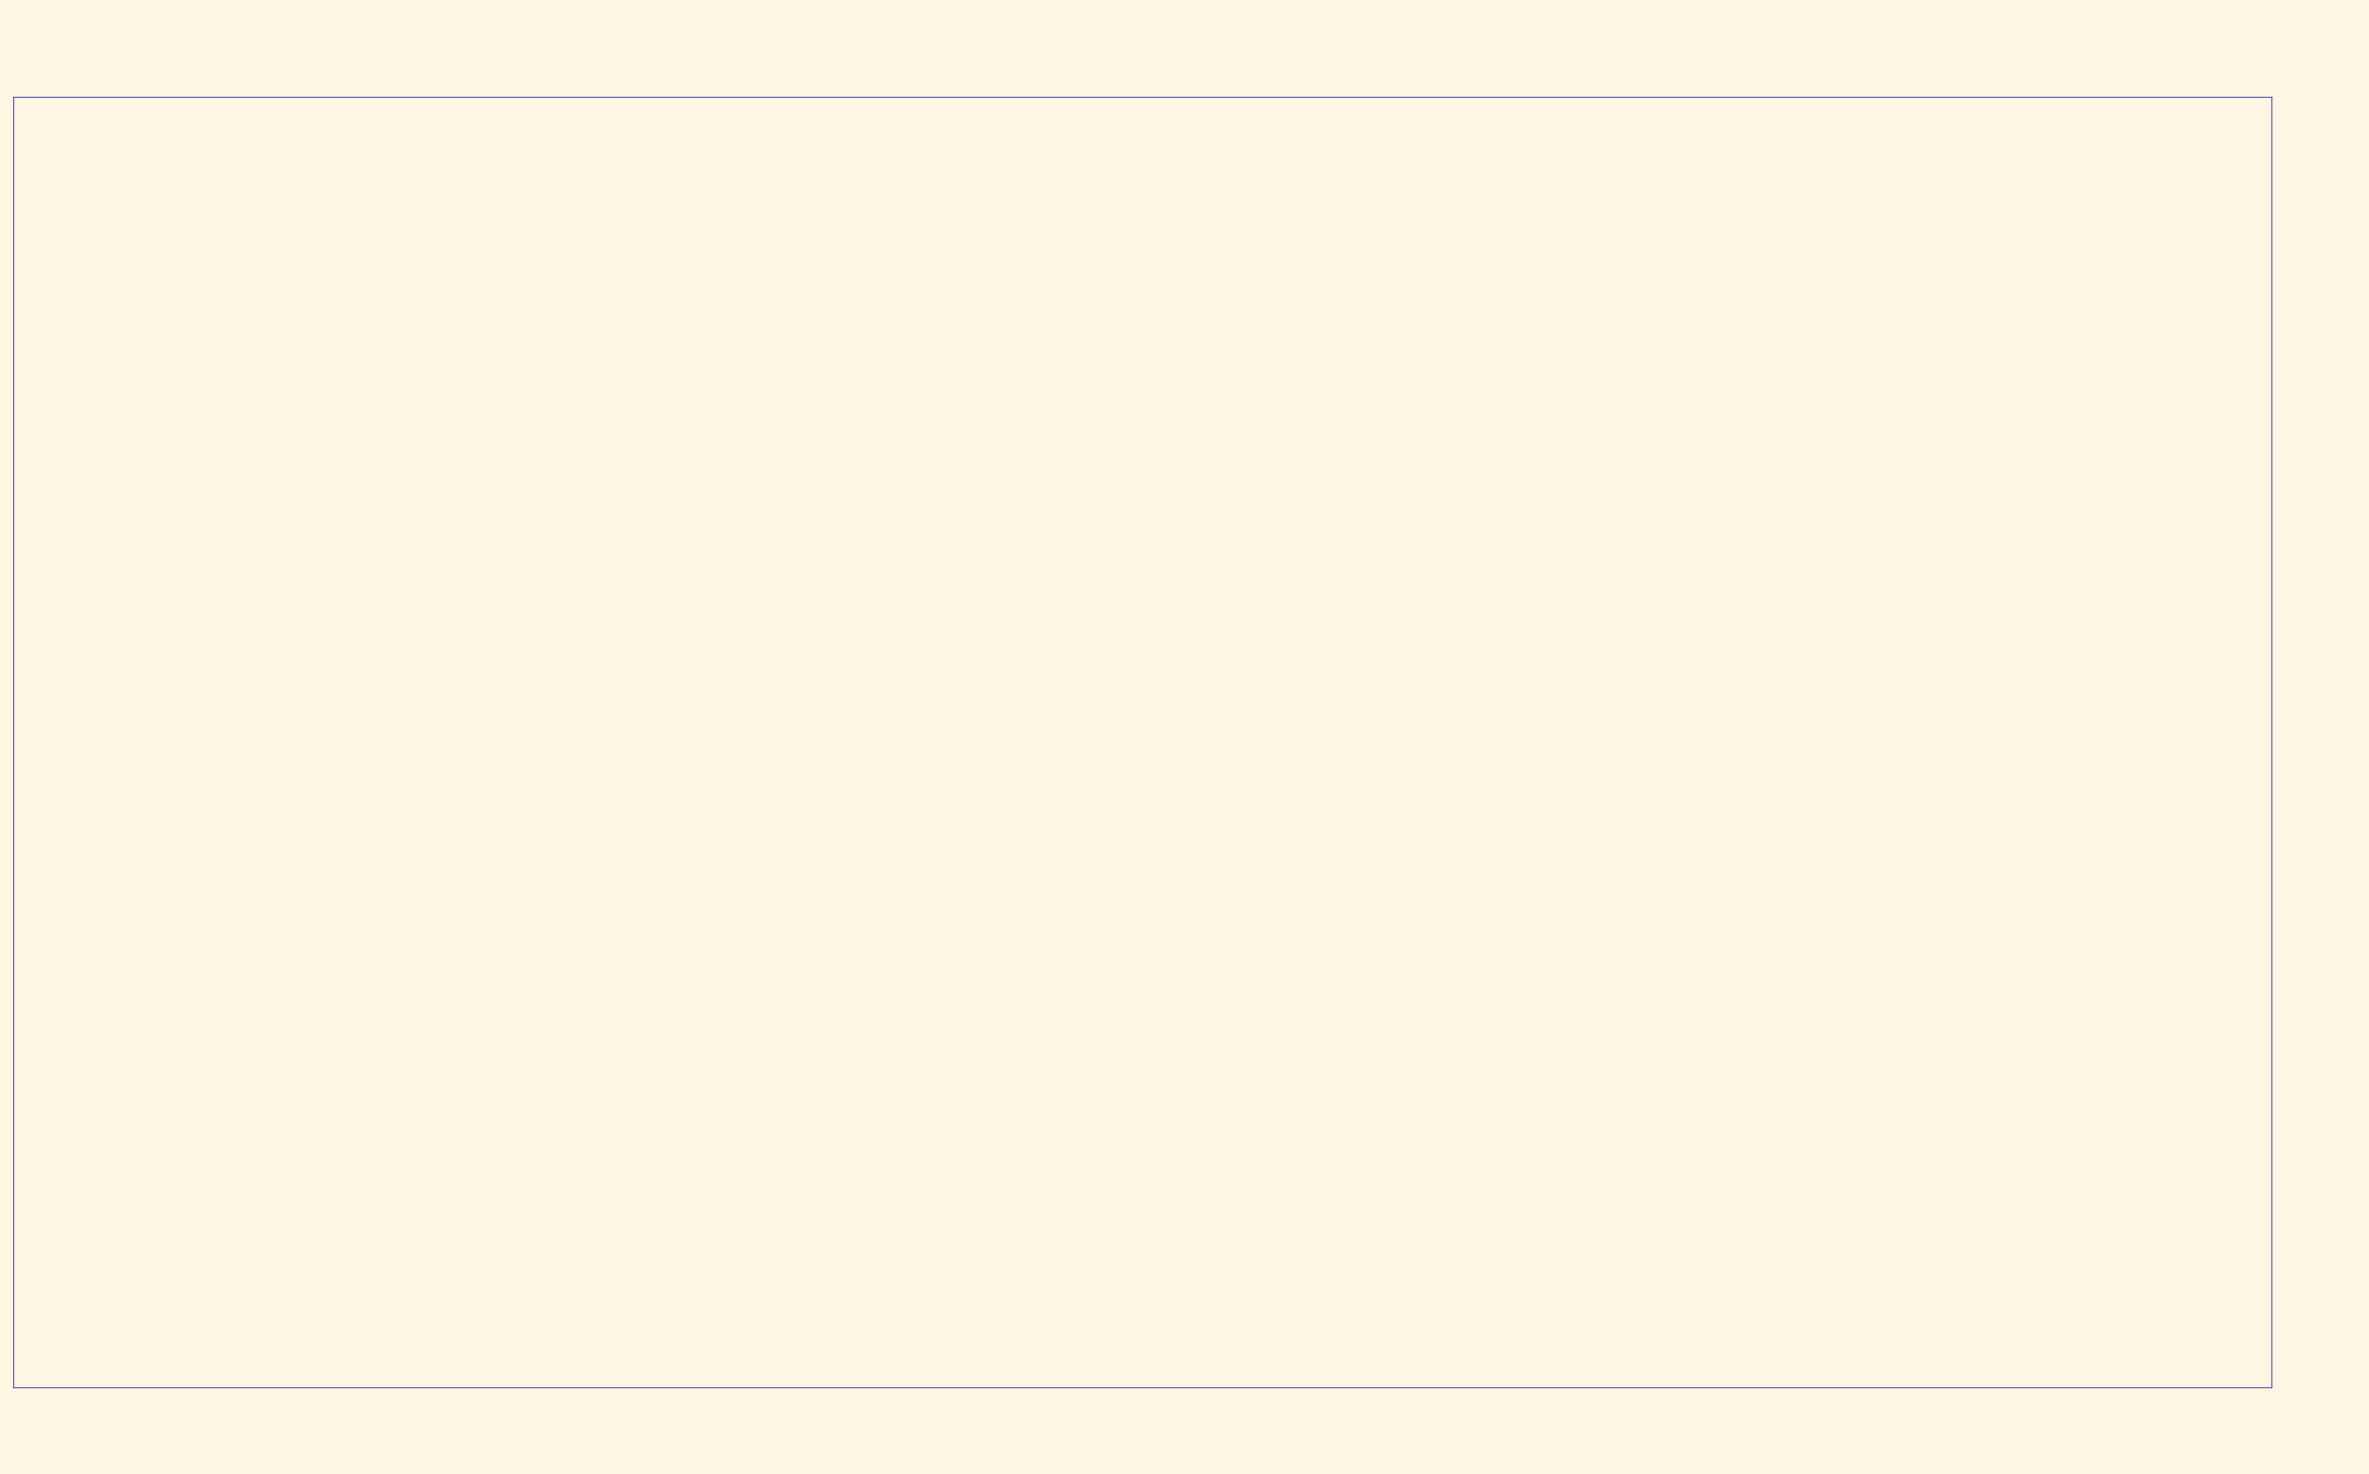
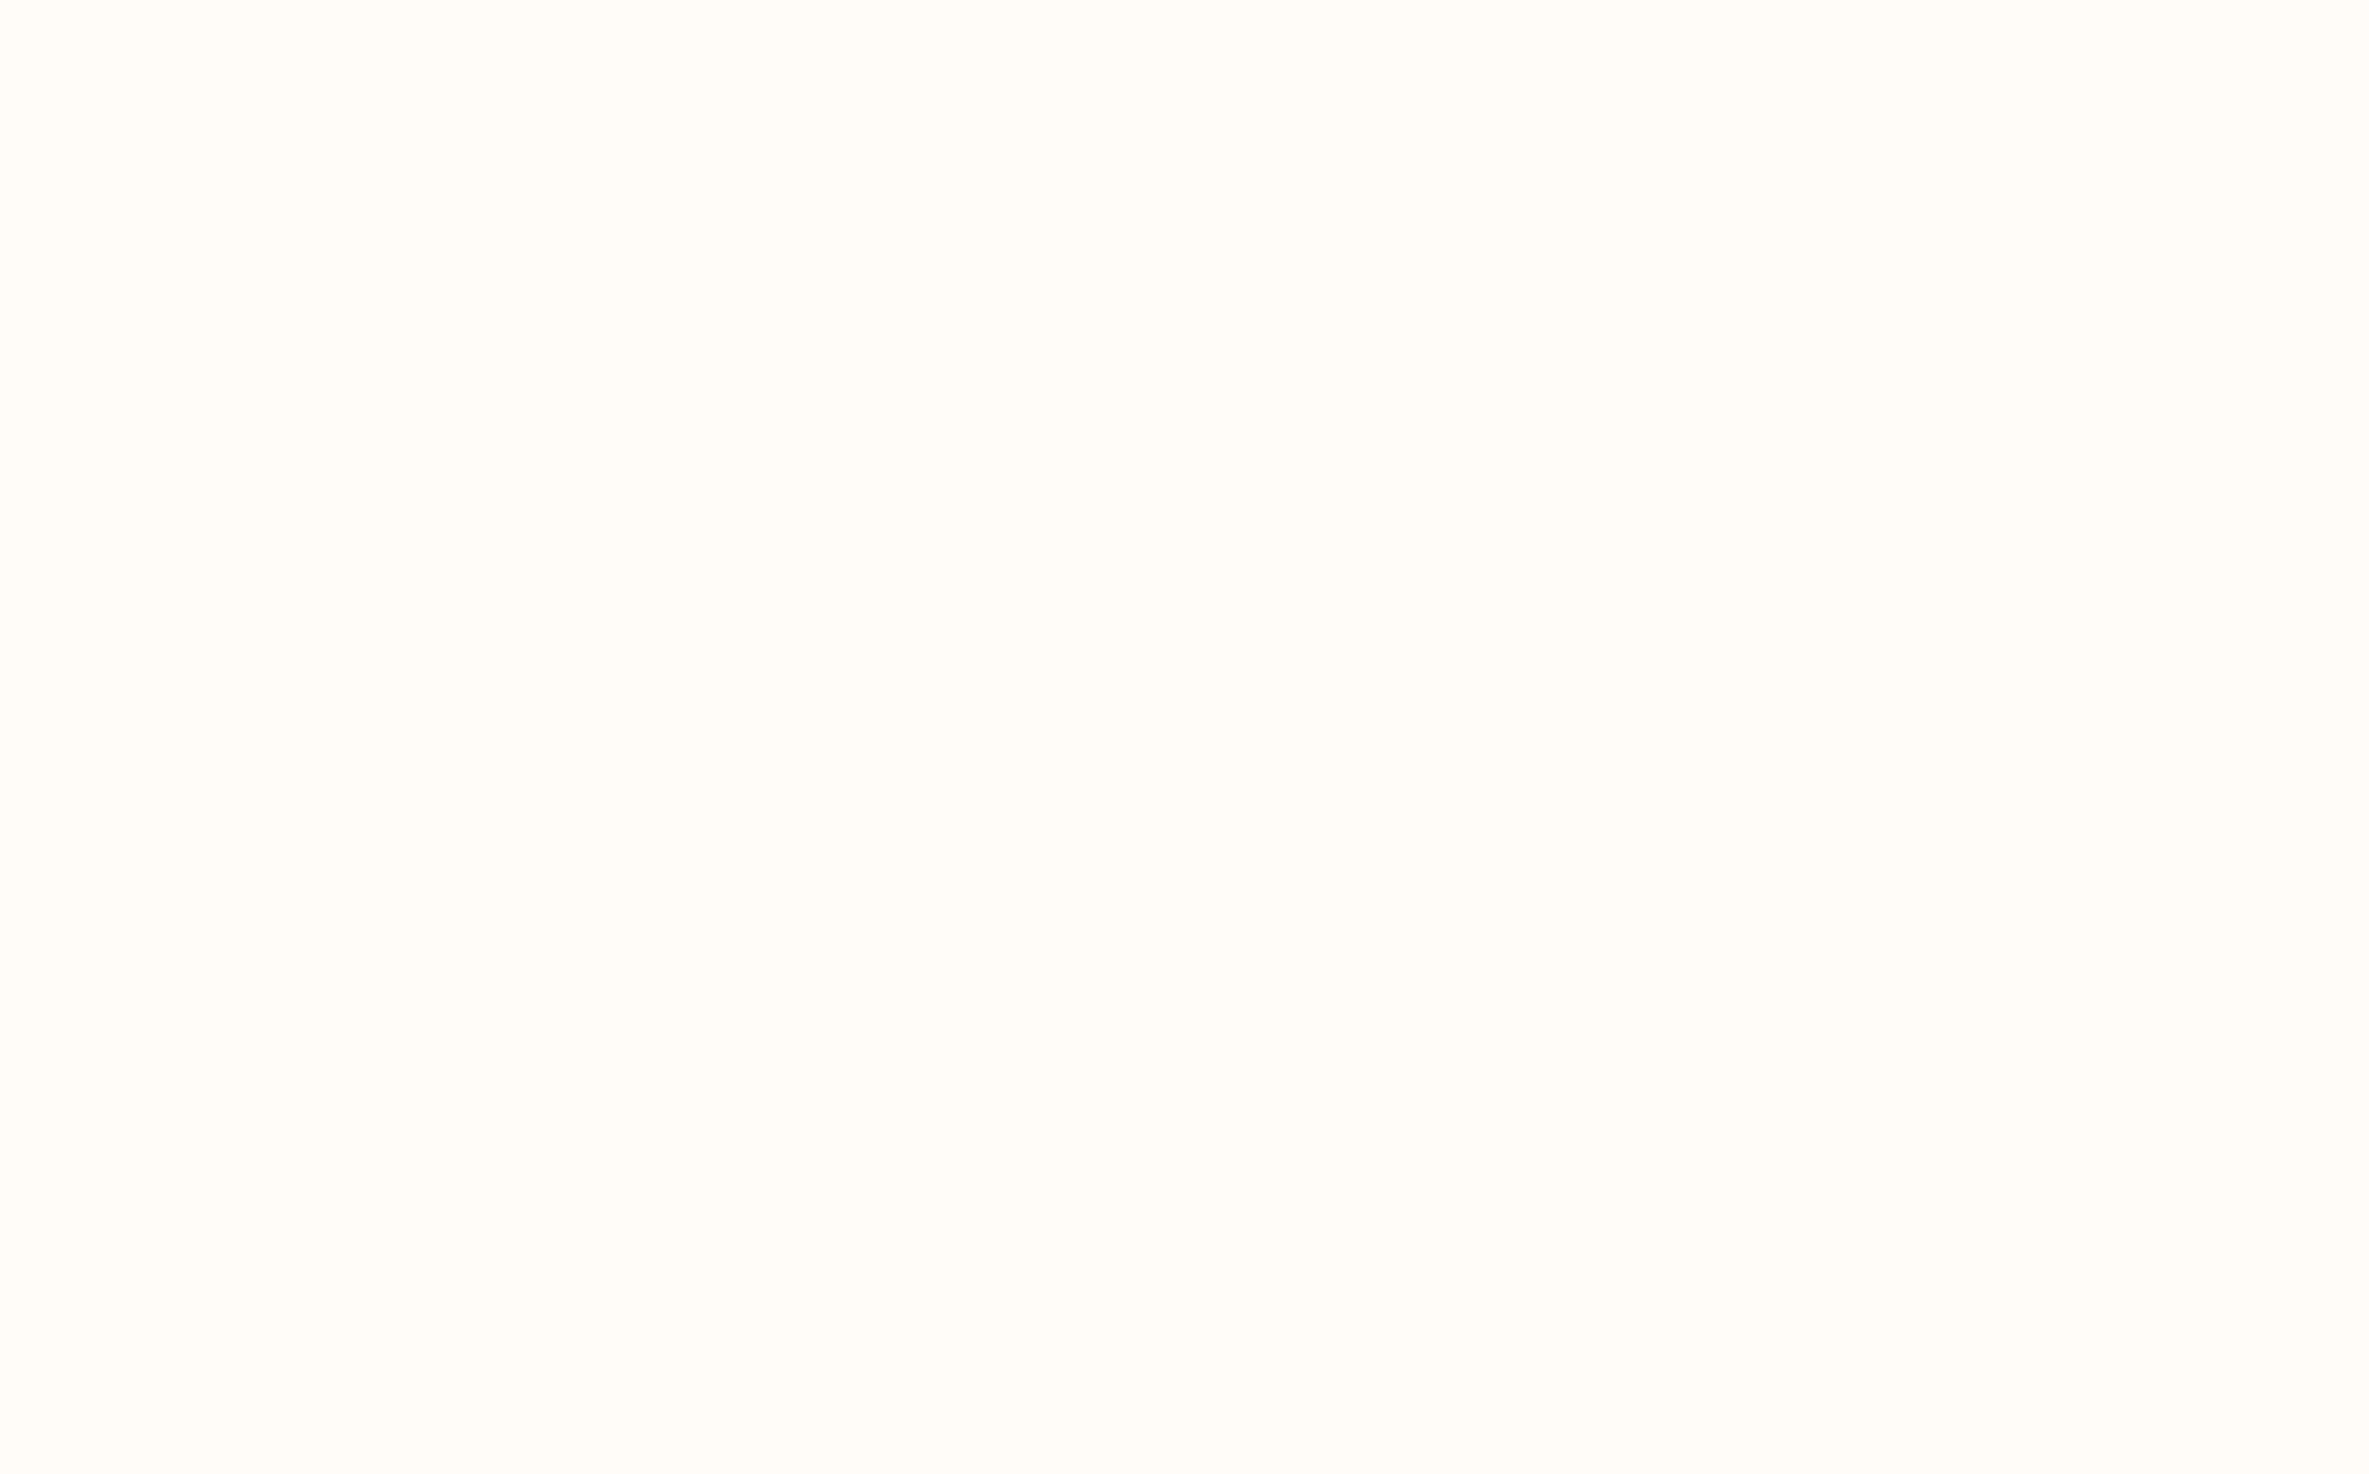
line: (13, 97) (2271, 97) (2271, 1387) (13, 1387) (13, 97) -> none

